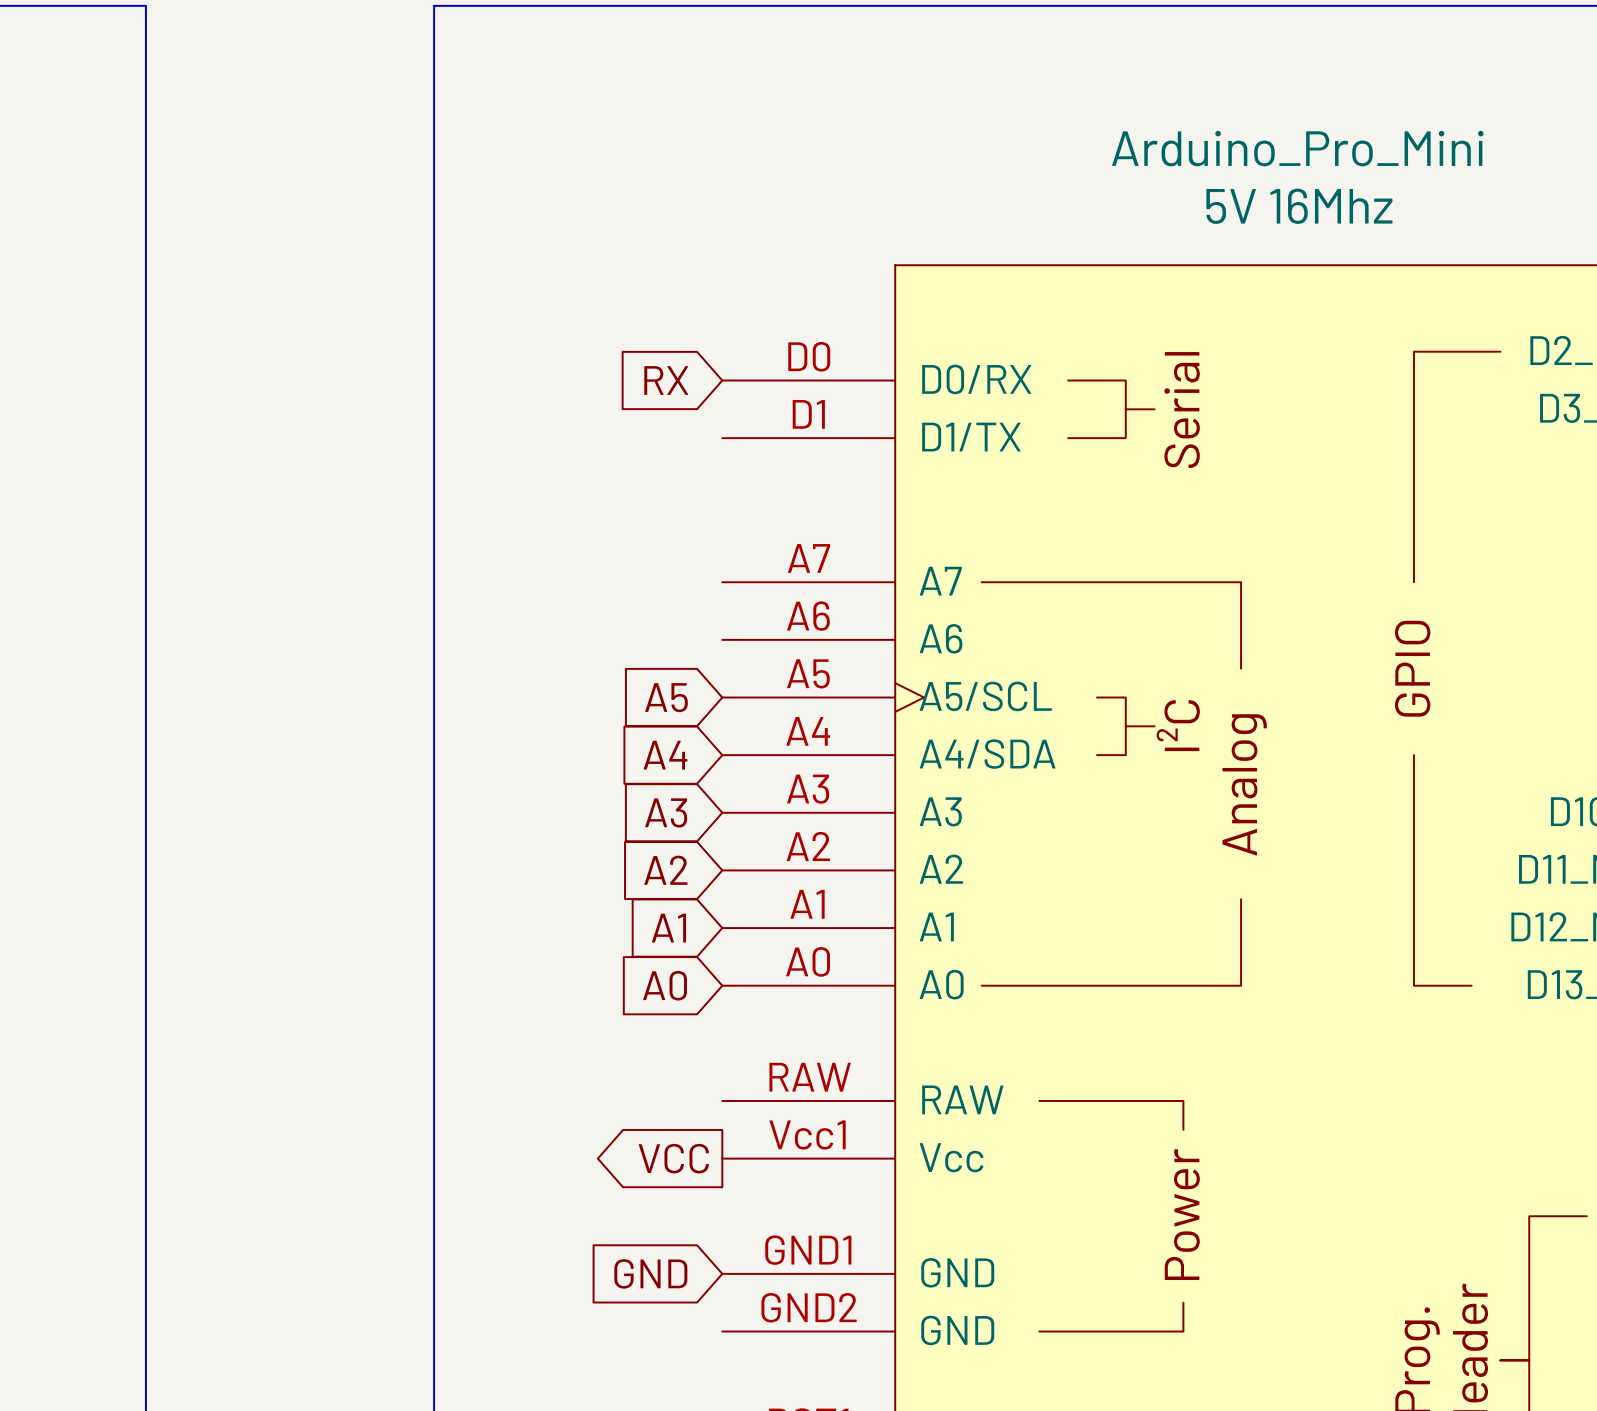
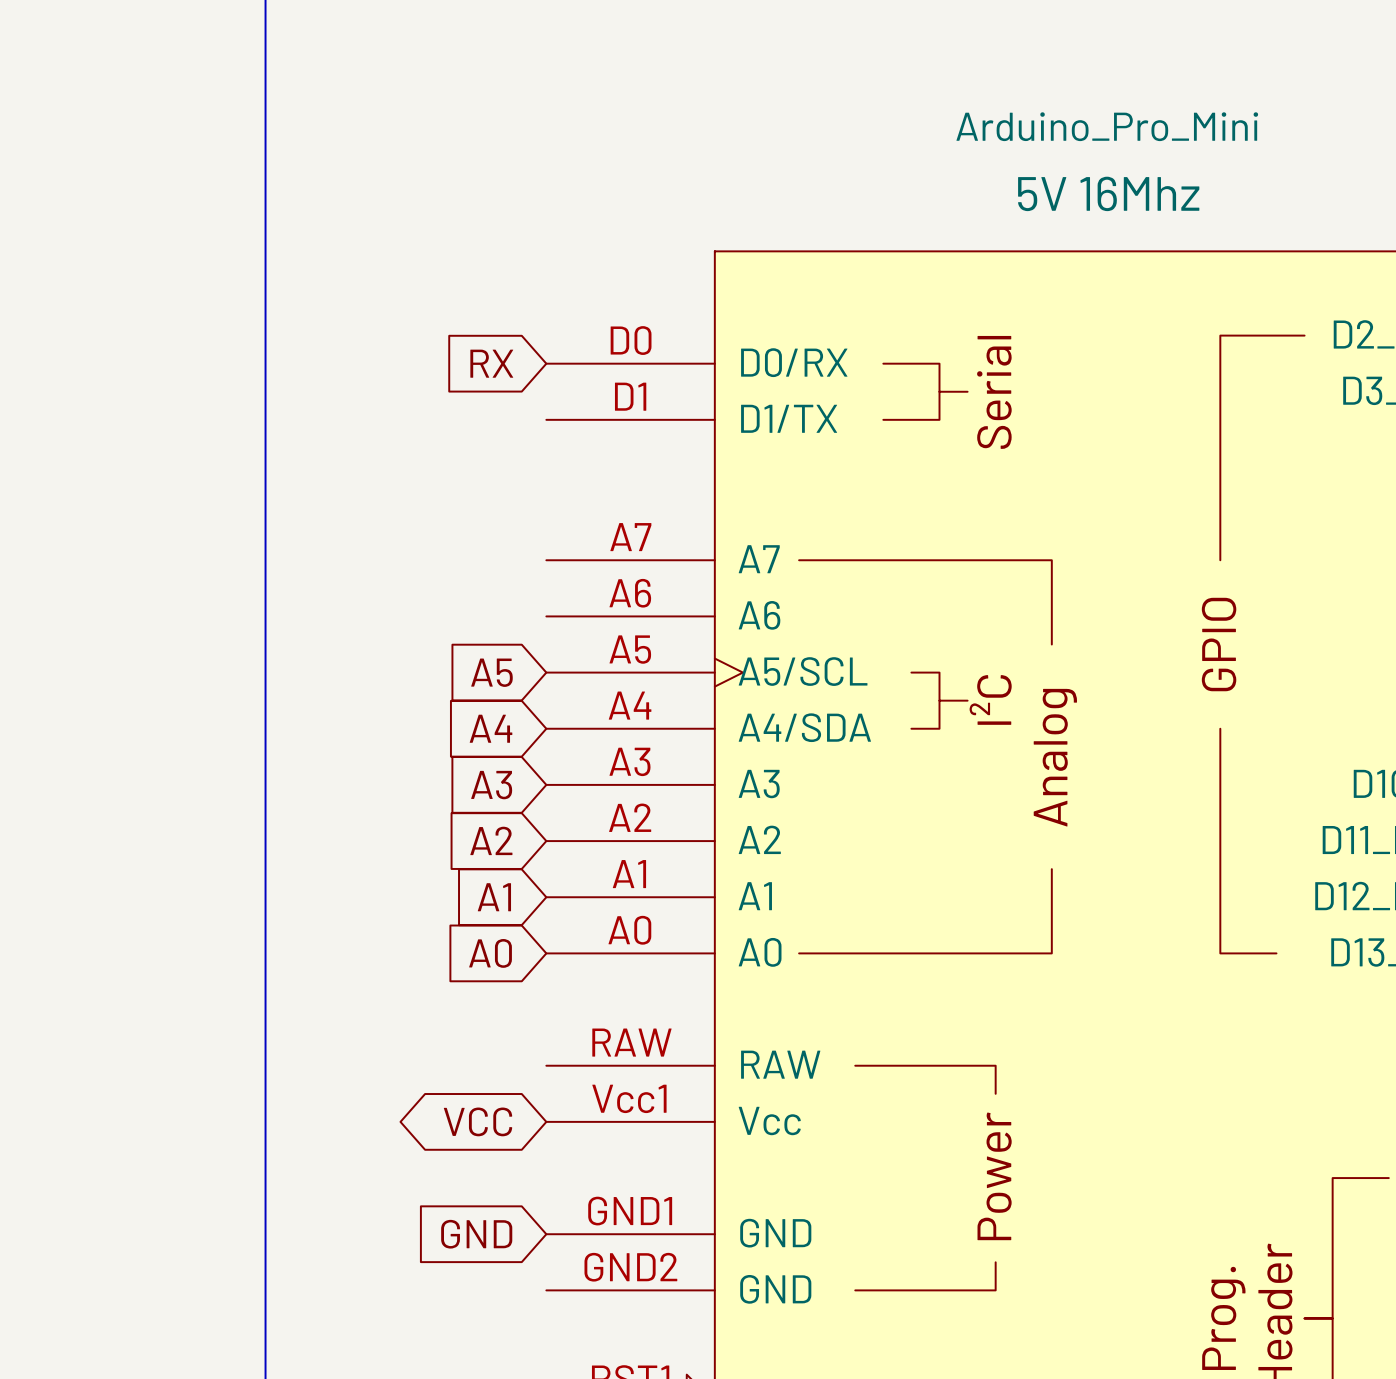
Arduino_Pro_Mini text: none -> Arduino_Pro_Mini (1107, 126)
Arduino_Pro_Mini name: Arduino_Pro_Mini (1297, 148) -> none
global label shape: output (673, 1158) -> bidirectional (477, 1121)

